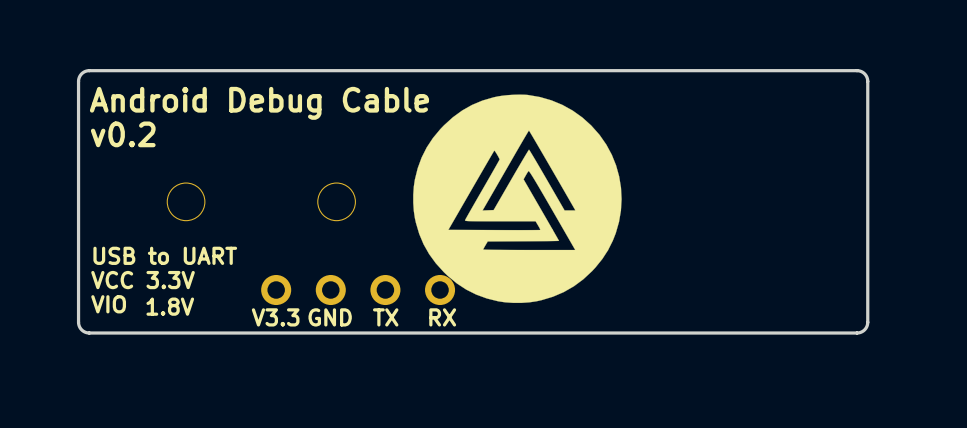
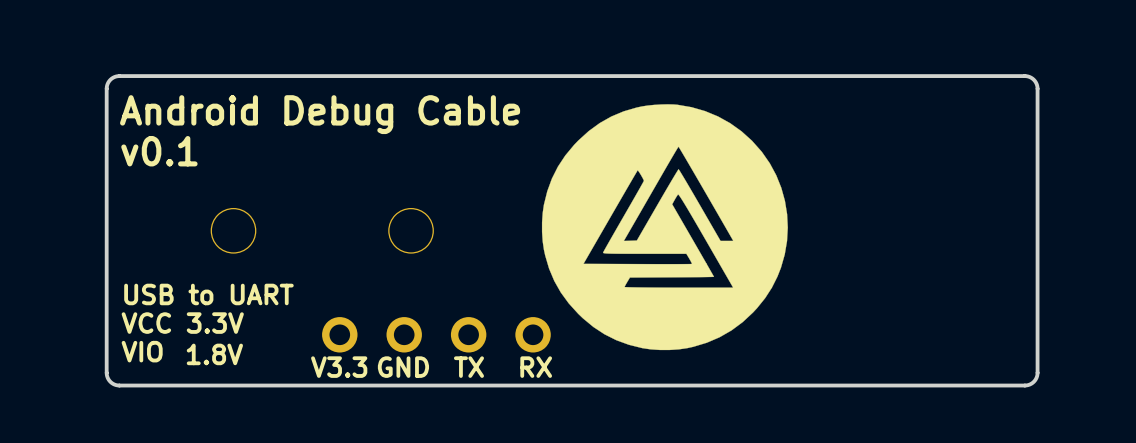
text: v0.2 (123, 134) -> v0.1 (159, 151)
drawing position: (517, 198) -> (664, 227)

